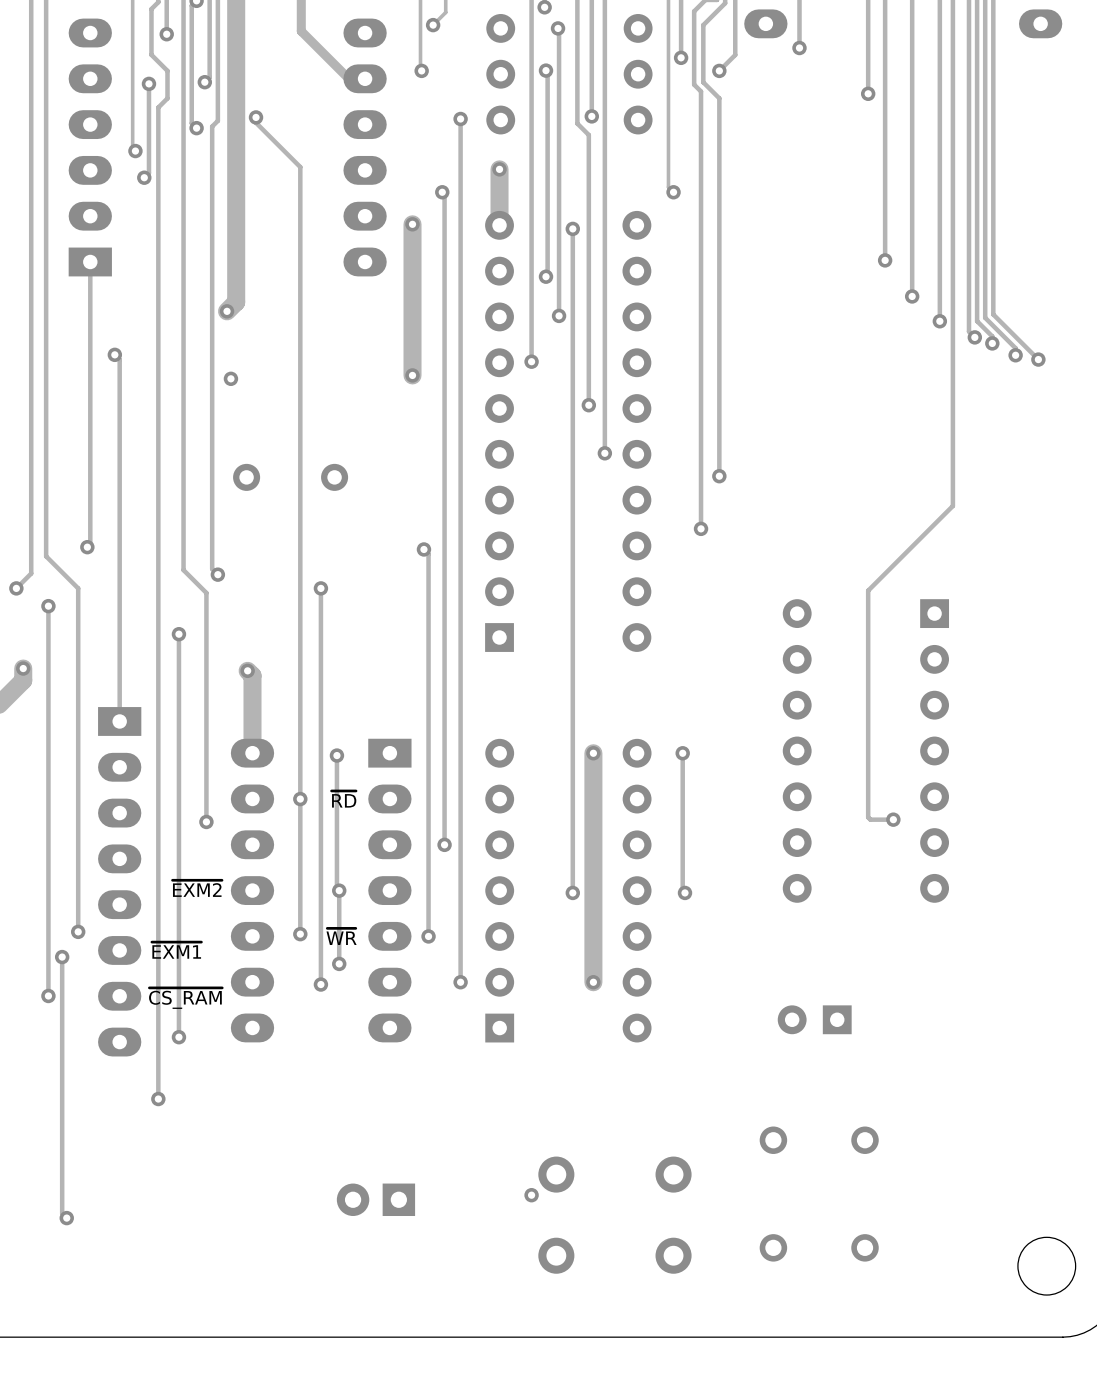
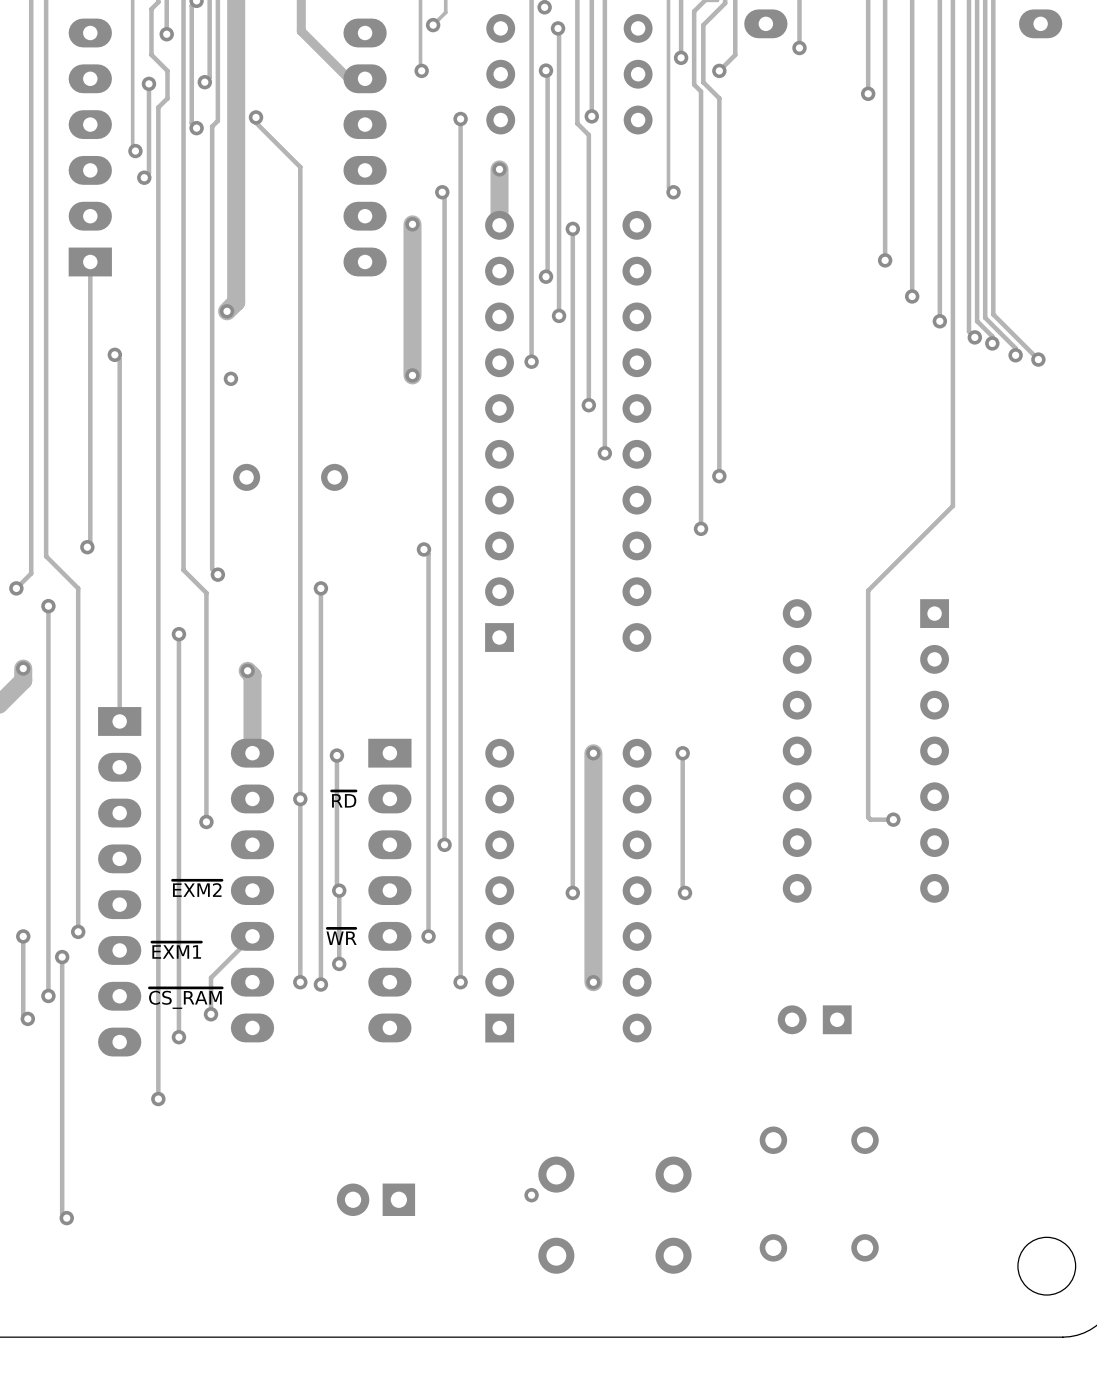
track: none -> (300, 934) (300, 982)
via position: (300, 934) -> (300, 982)
track: none -> (23, 936) (23, 1014) (27, 1018)
via: none -> (23, 936)
track: none -> (252, 936) (211, 977) (211, 1014)
via: none -> (211, 1014)
via: none -> (27, 1018)

